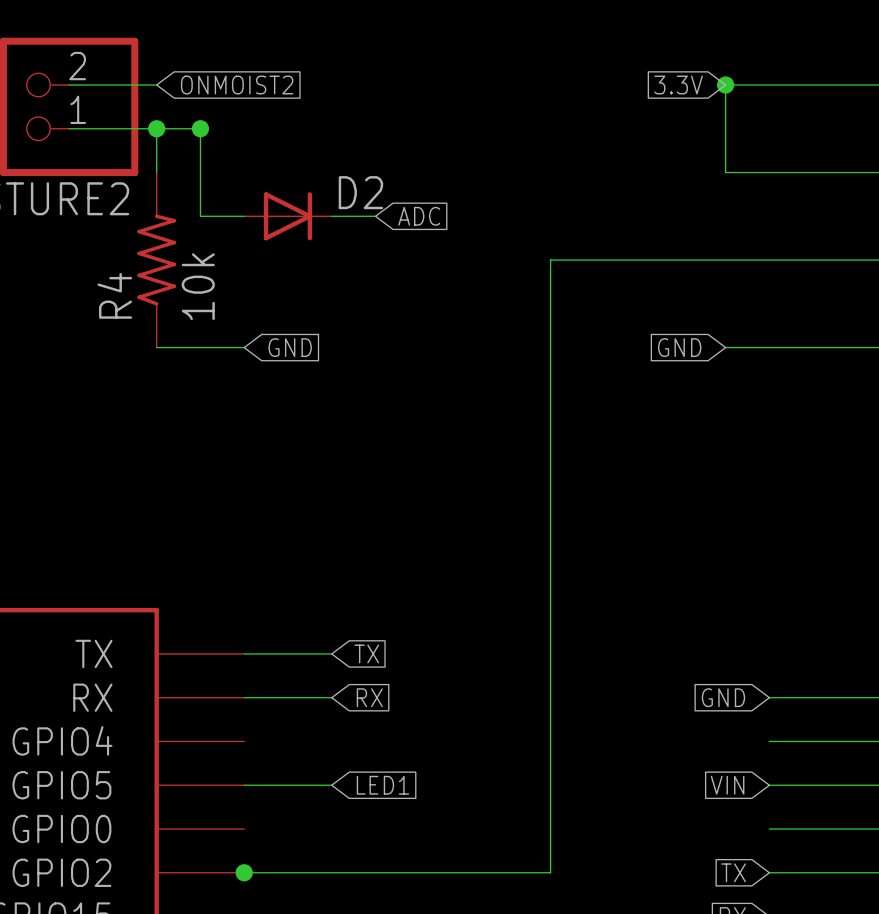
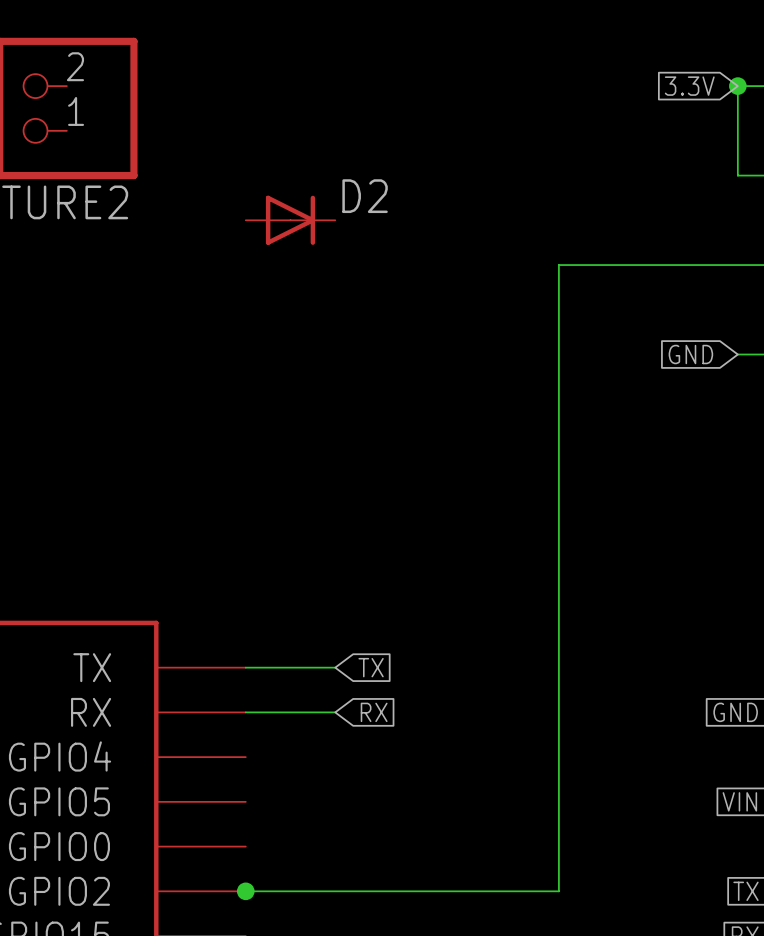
wire: (69, 85) (156, 85) -> none
global label: ONMOIST2 (237, 85) -> none
wire: (69, 128) (200, 128) (200, 216) (244, 216) -> none
wire: (156, 128) (156, 172) -> none
junction: (156, 128) -> none
junction: (200, 128) -> none
wire: (331, 216) (375, 216) -> none
global label: ADC (419, 216) -> none
R4: 10k (156, 260) -> none
wire: (156, 347) (244, 347) -> none
global label: GND (290, 347) -> none
wire: (244, 785) (331, 785) -> none
global label: LED1 (382, 785) -> none

